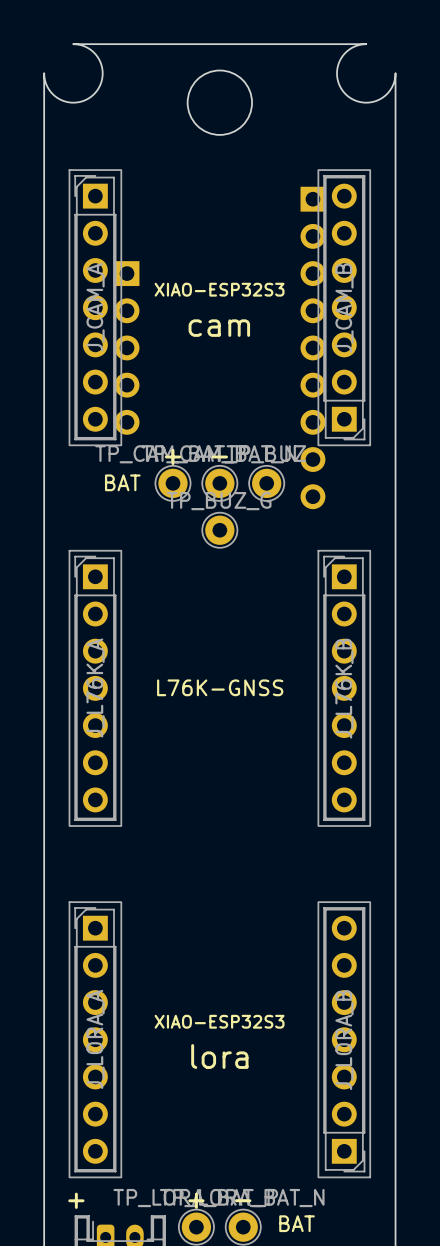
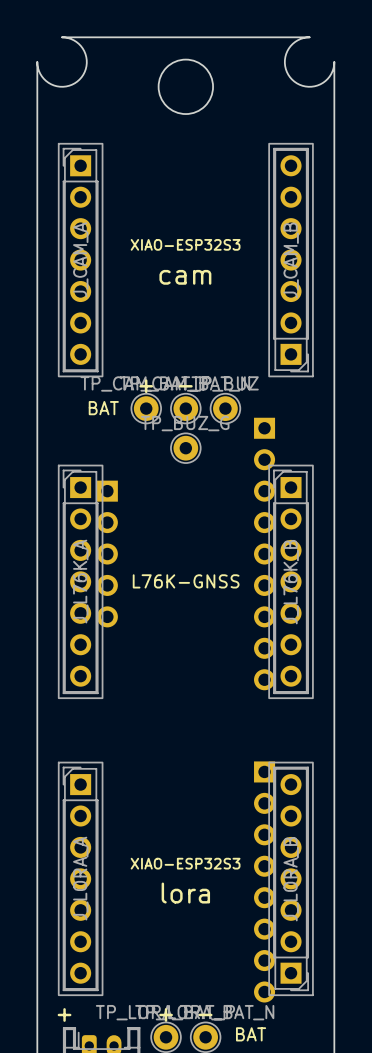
part position: (127, 347) -> (107, 554)
part position: (312, 347) -> (264, 554)
part: none -> (264, 881)

